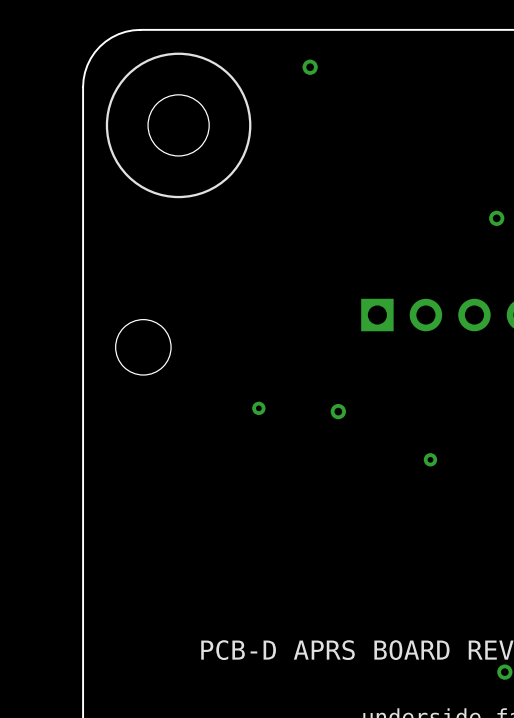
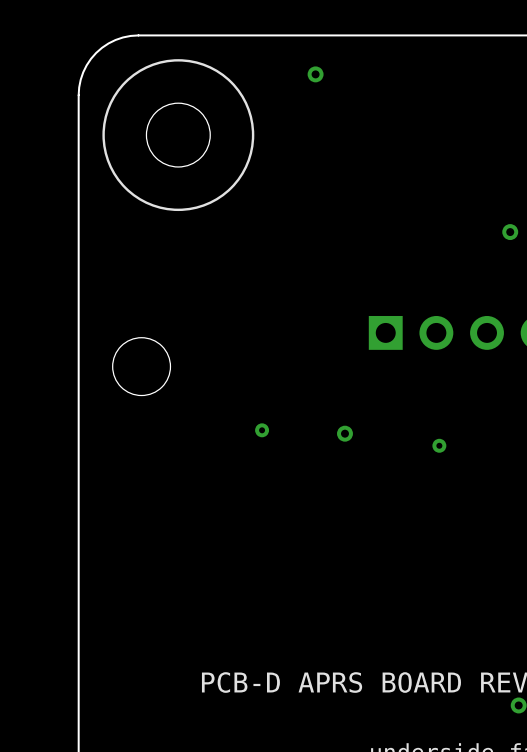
via position: (430, 459) -> (439, 445)

